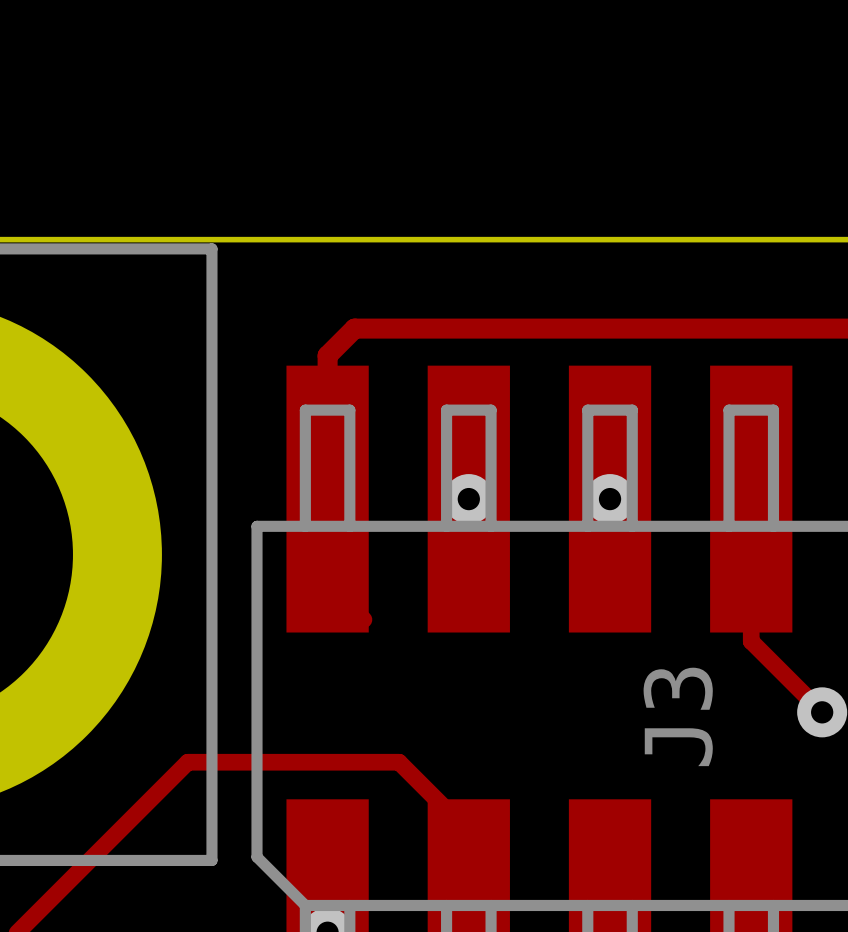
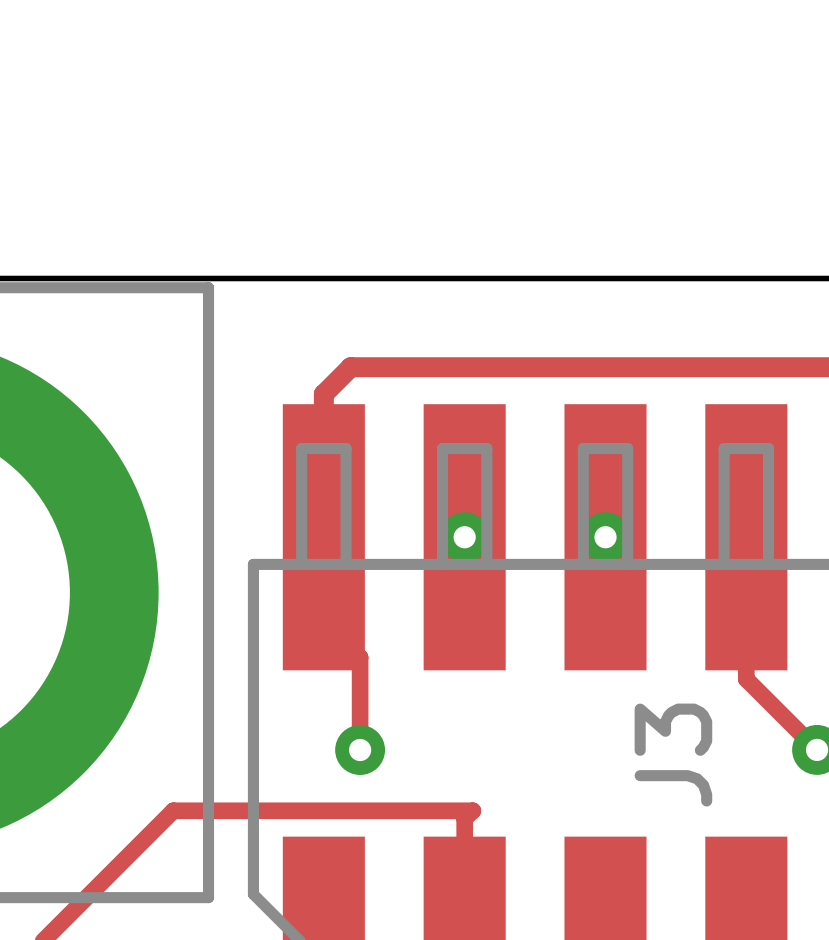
track: none -> (360, 657) (360, 750)
via: none -> (360, 750)
track: (176, 773) (187, 762) (399, 762) (468, 831) -> (173, 810) (472, 810) (464, 818) (464, 869)

